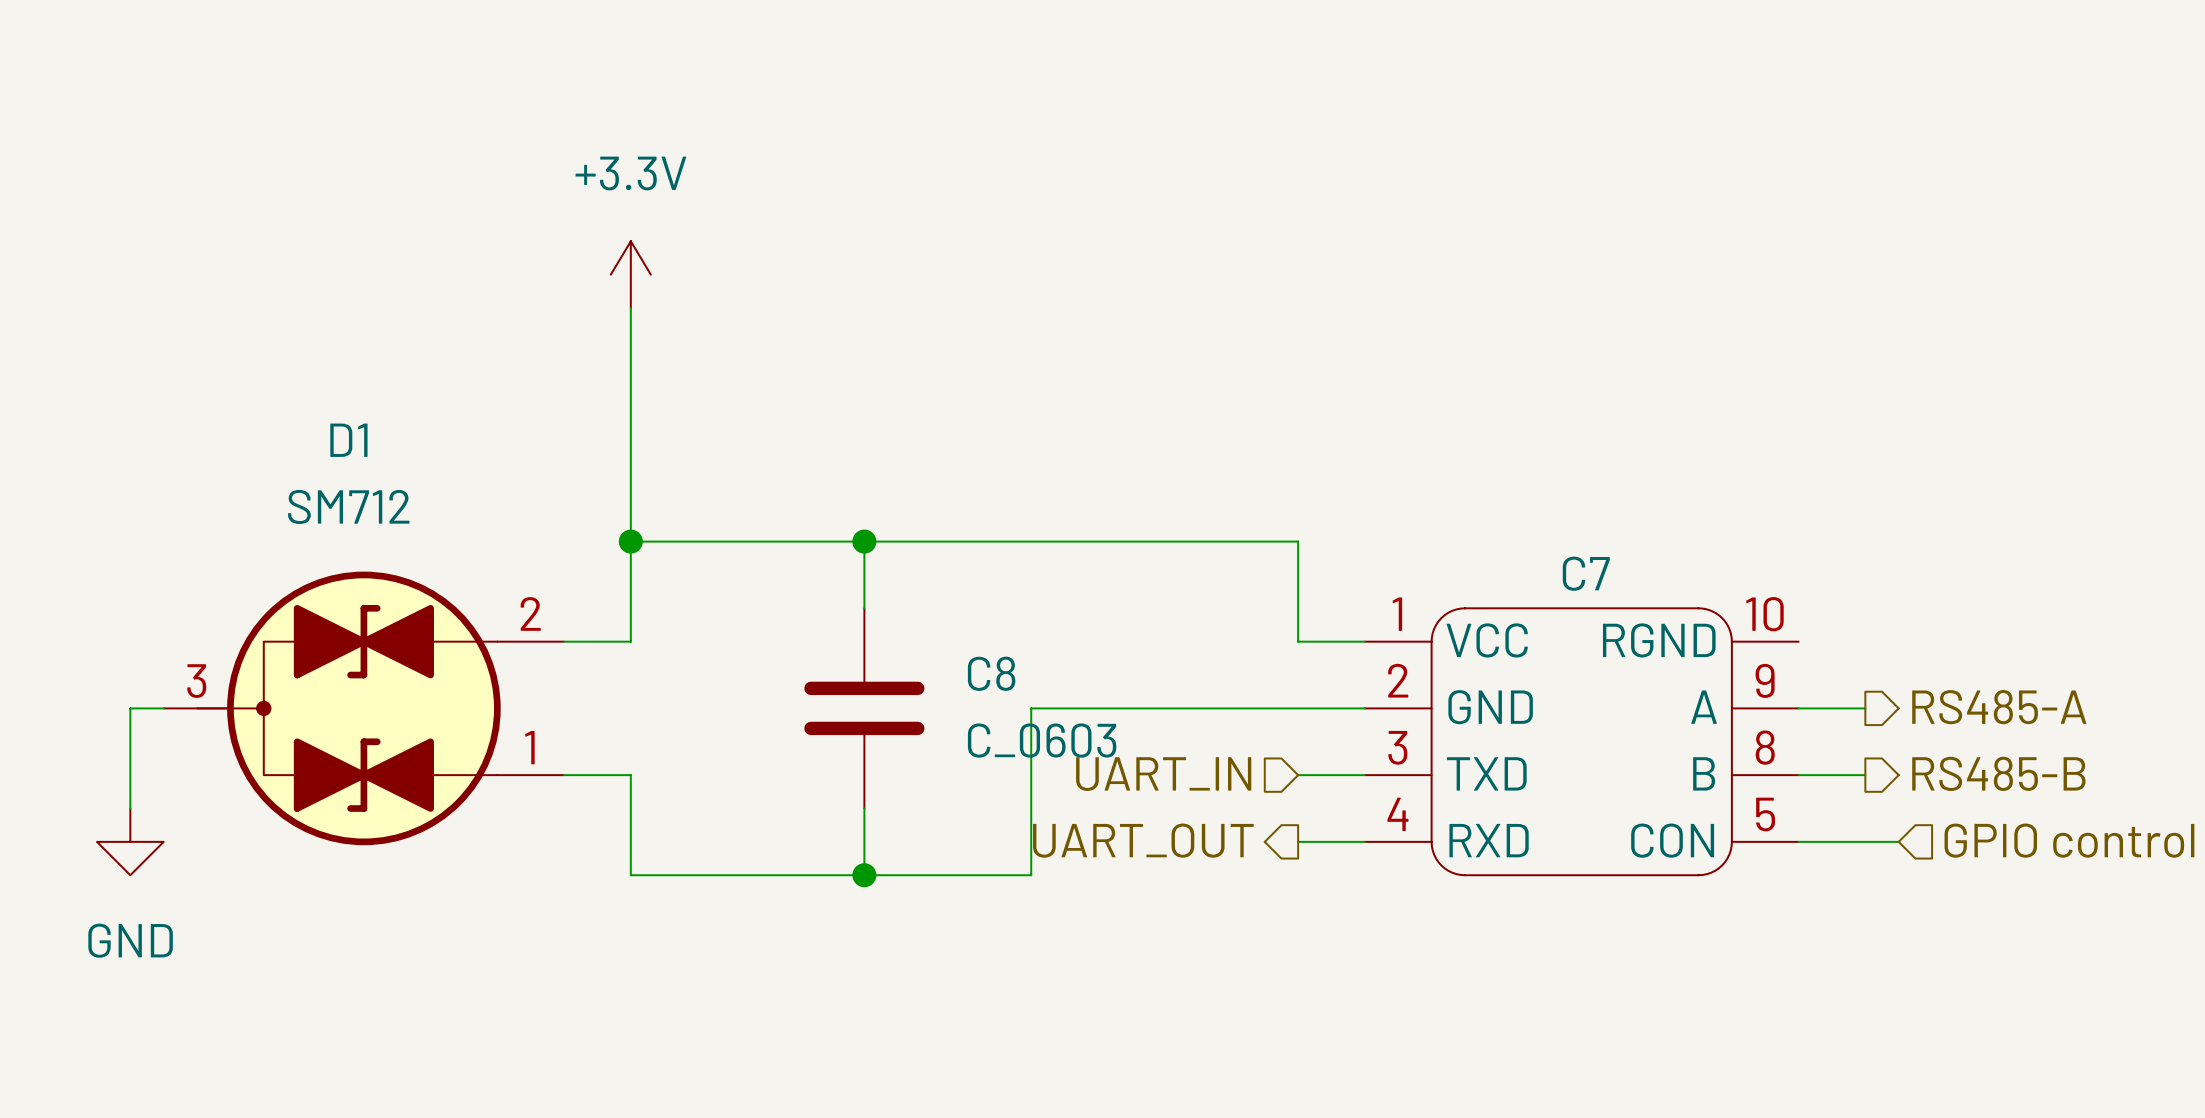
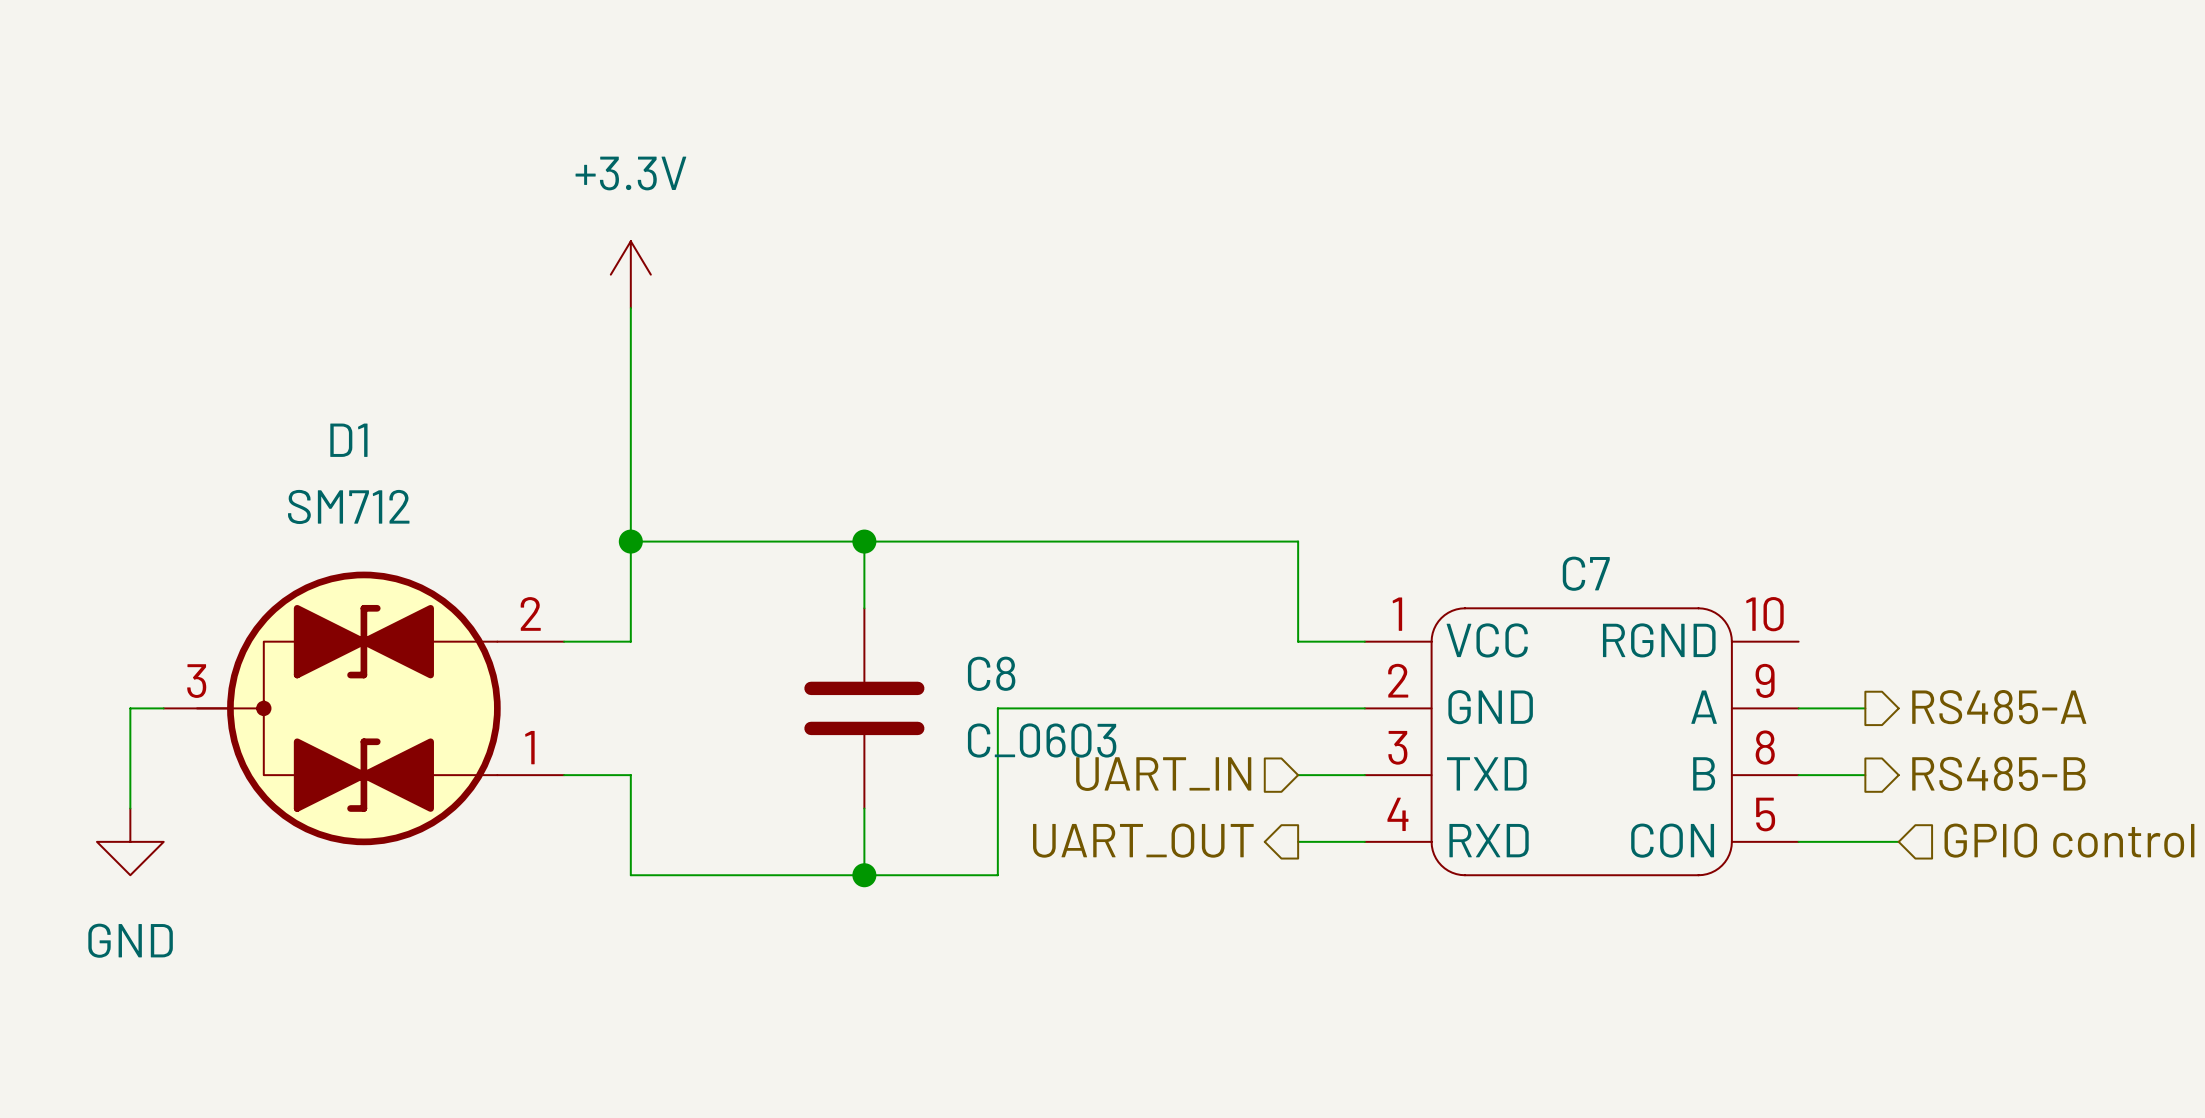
wire: (1031, 708) (1031, 875) (997, 875) -> (1031, 708) (997, 708) (997, 875)

